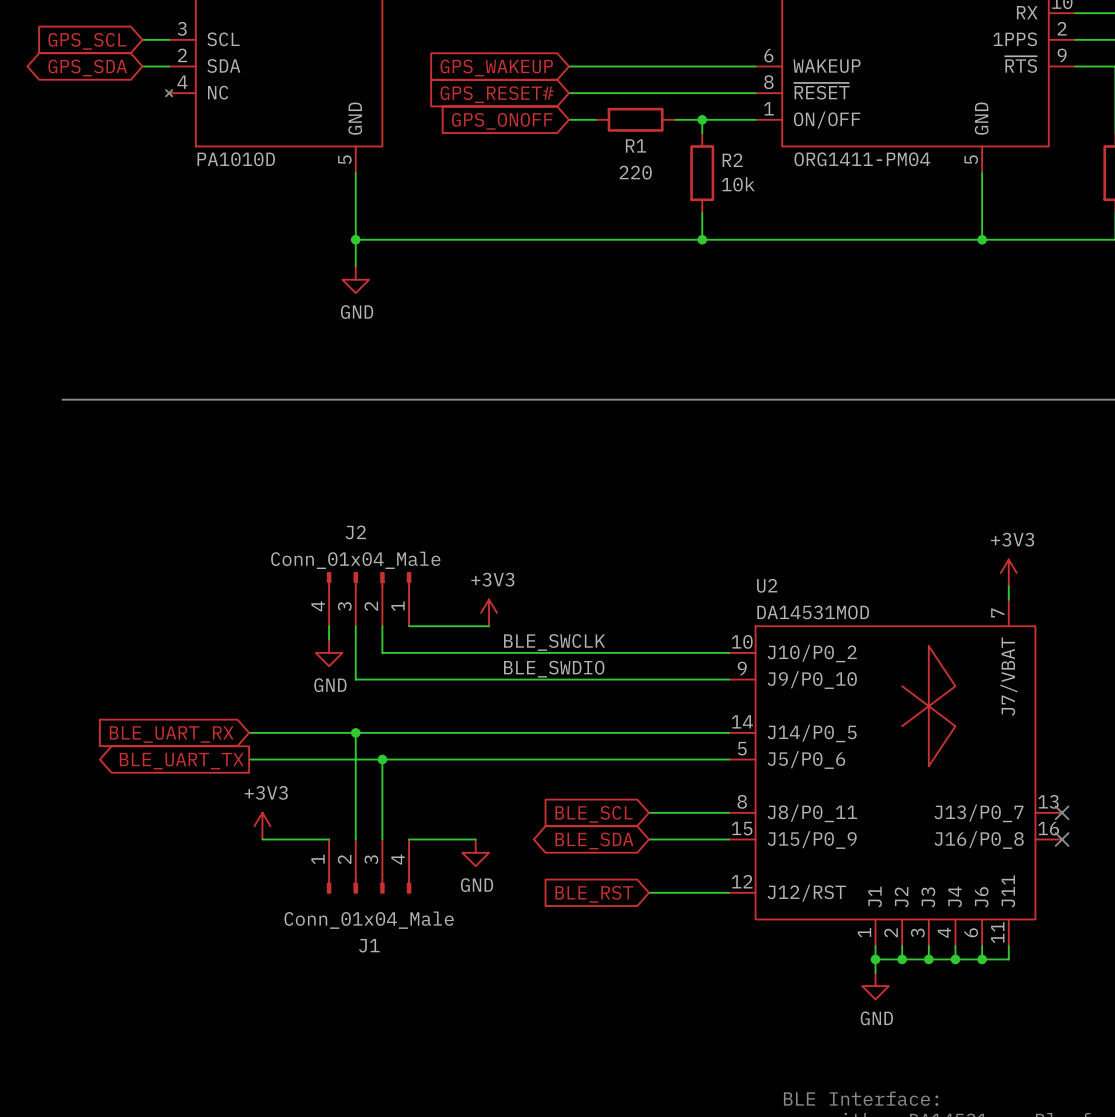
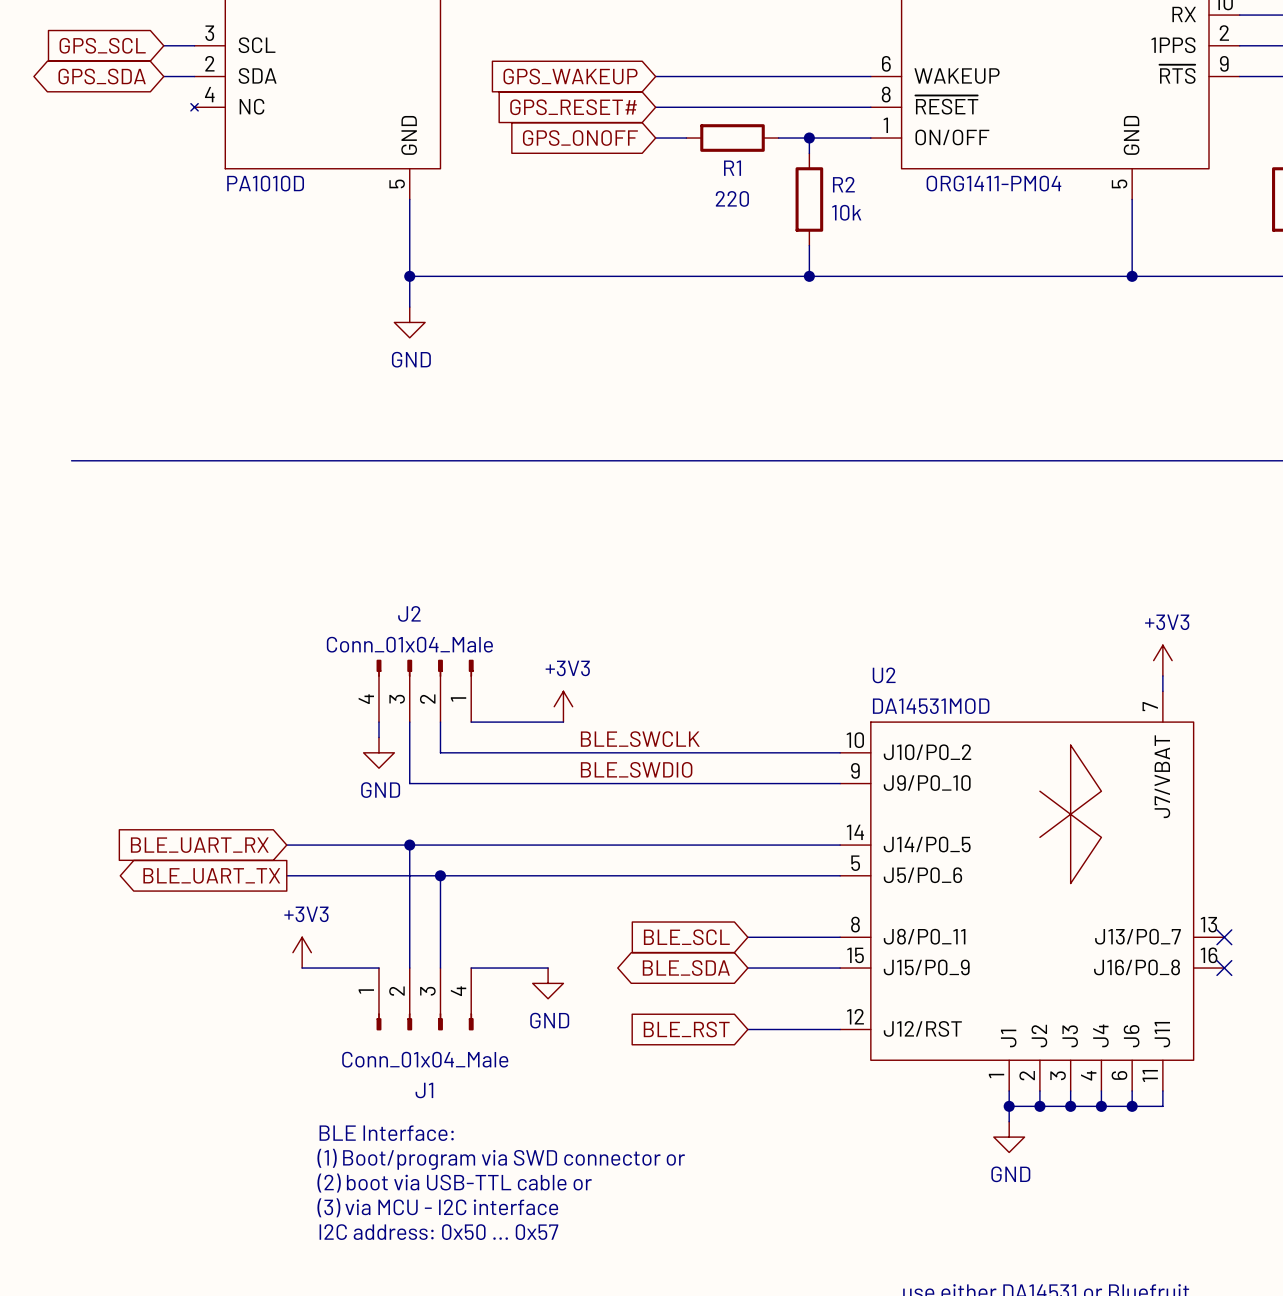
text: none -> BLE Interface: (386, 1133)
text: none -> (1) Boot/program via SWD connector or (501, 1159)
text: none -> (2) boot via USB-TTL cable or (454, 1183)
text: none -> (3) via MCU - I2C interface (437, 1207)
text: none -> I2C address: 0x50 ... 0x57 (438, 1232)
text: BLE Interface: (861, 1098) -> none

